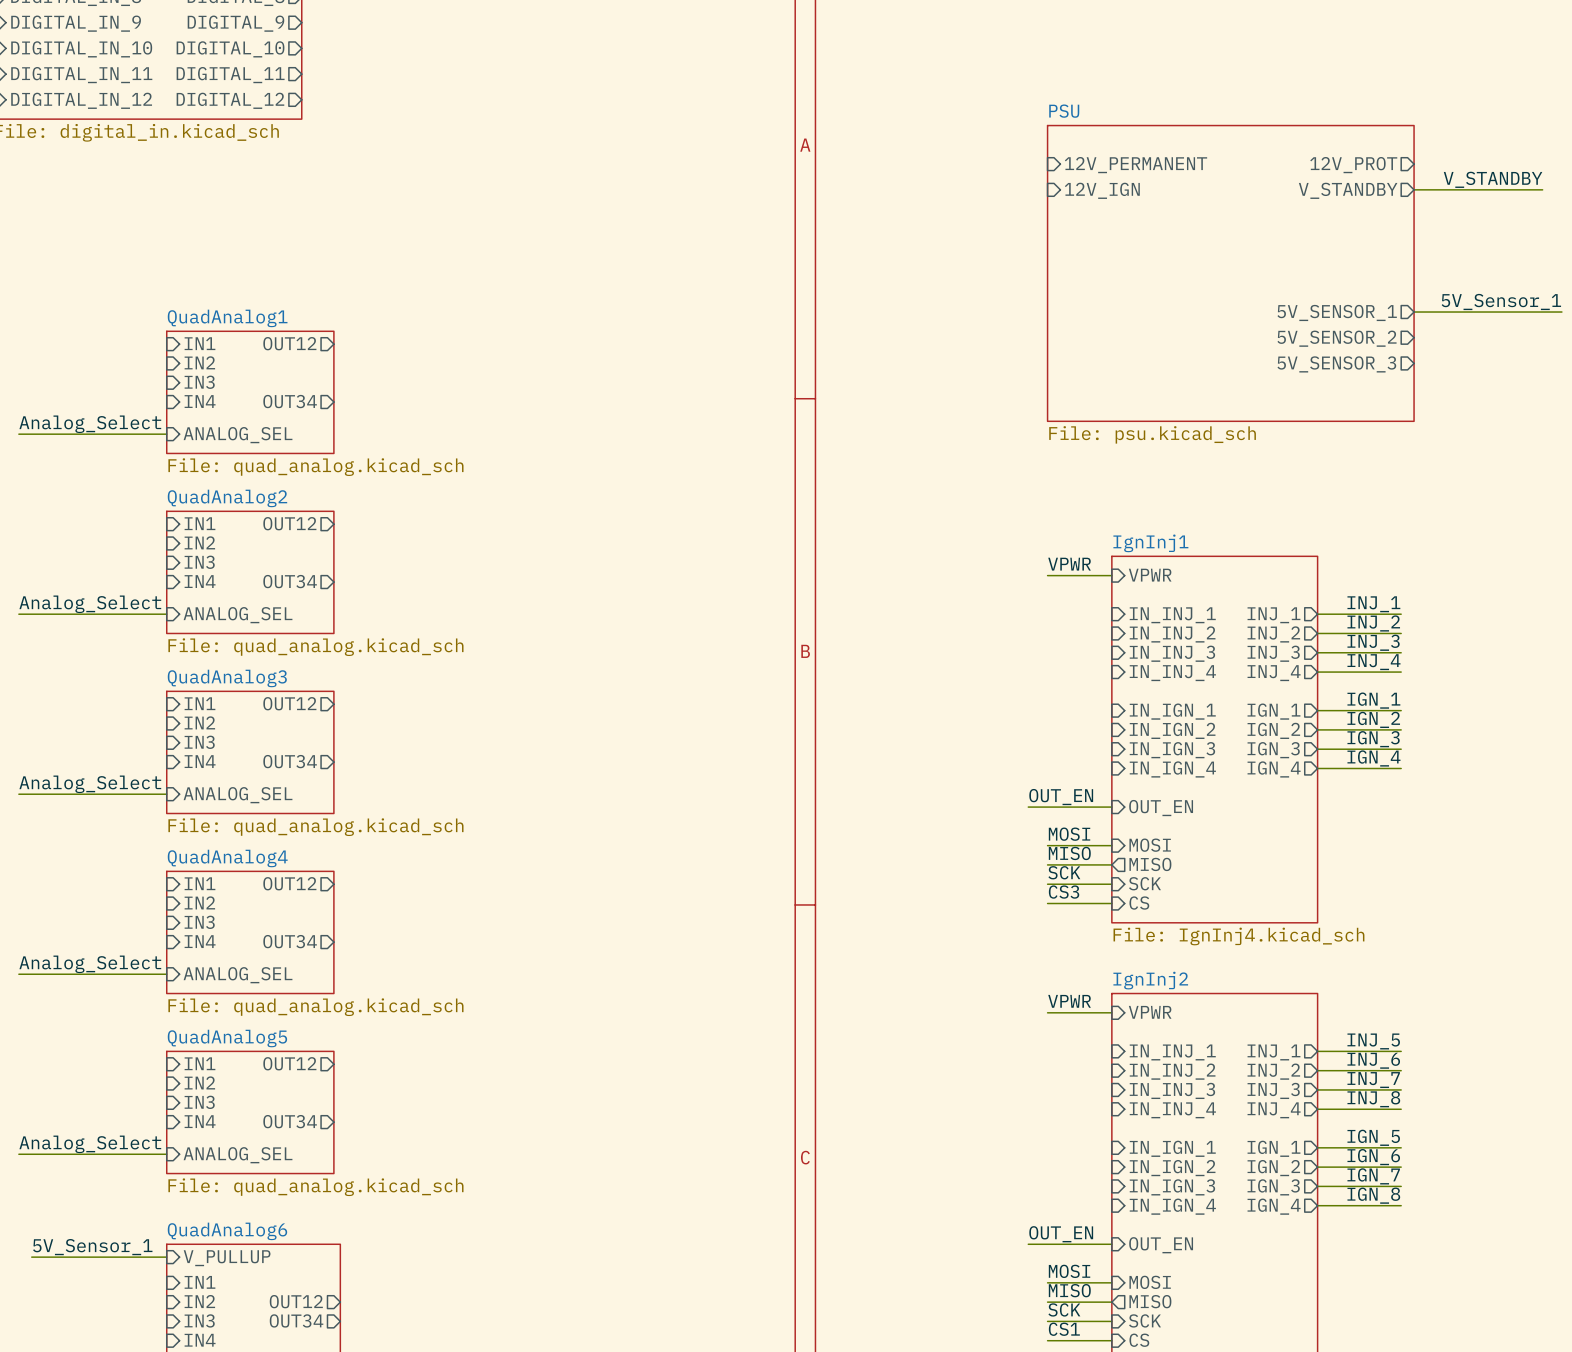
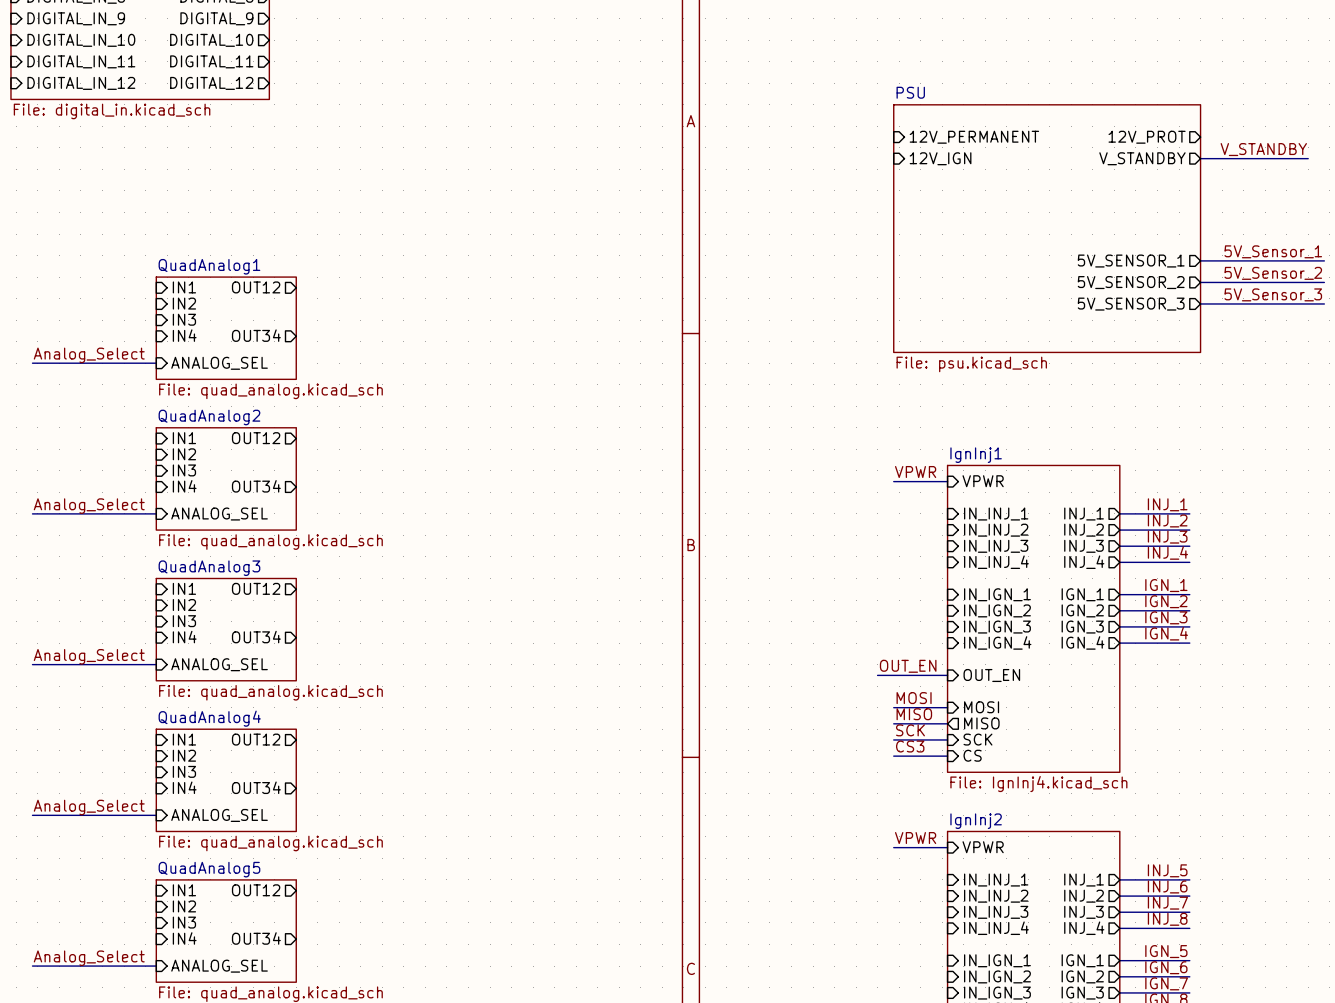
label: none -> 5V_Sensor_2 (1273, 273)
wire: none -> (1200, 282) (1324, 282)
label: none -> 5V_Sensor_3 (1273, 294)
wire: none -> (1200, 303) (1324, 303)

